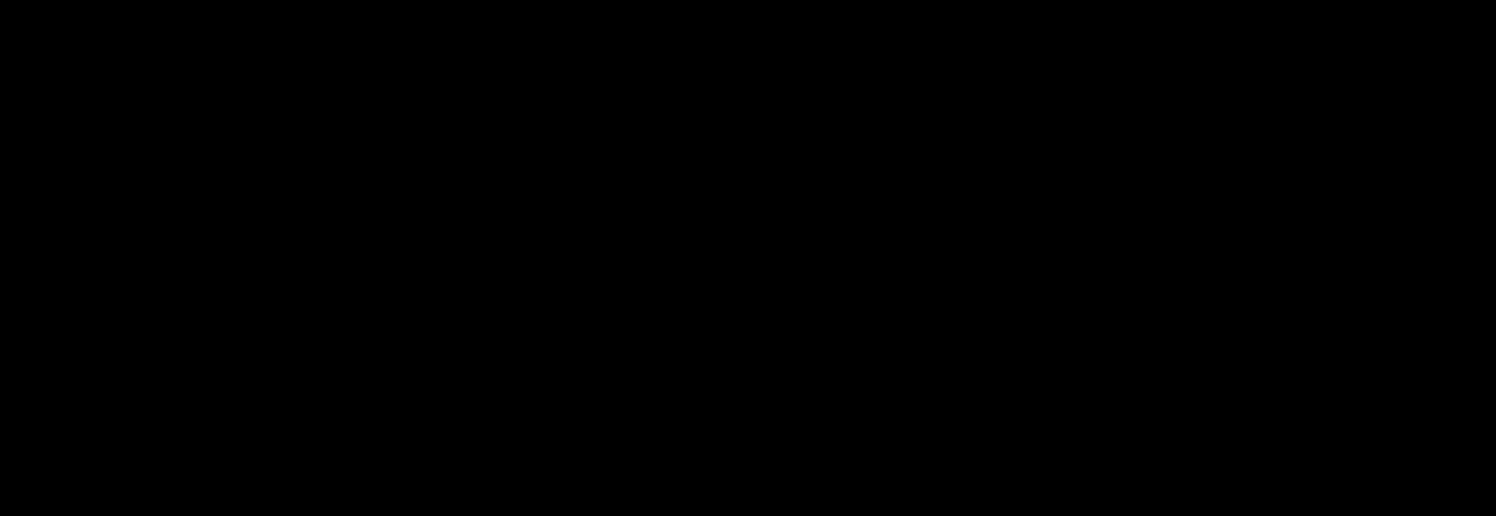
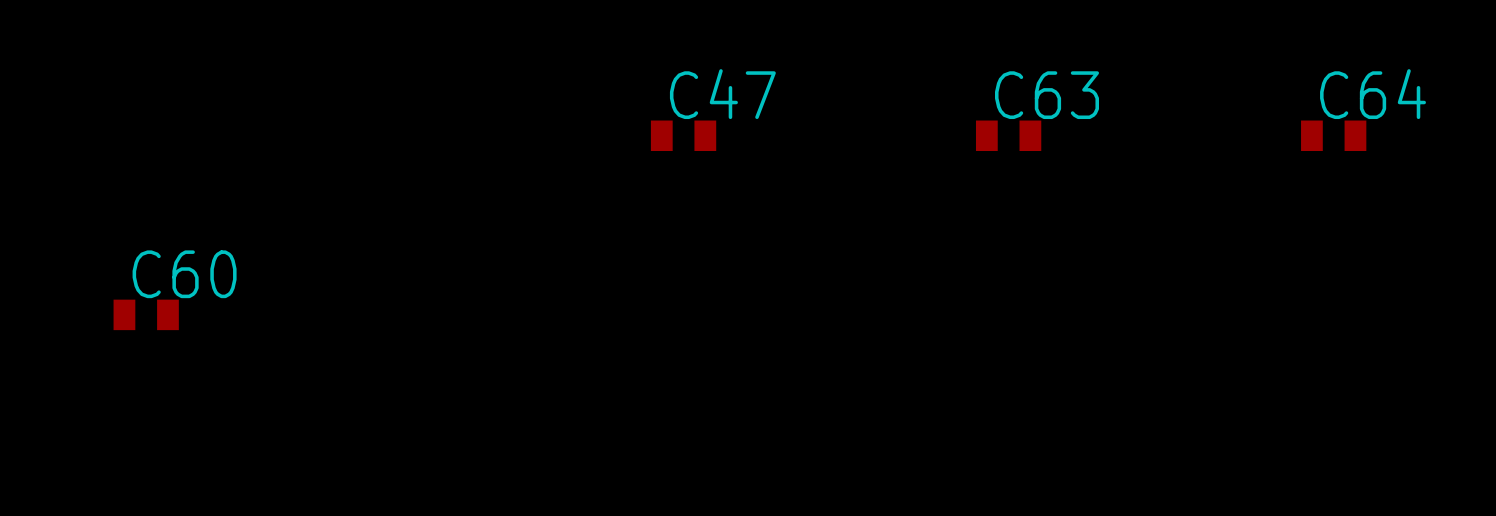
C47: none -> (683, 135)
C63: none -> (1008, 135)
C64: none -> (1333, 135)
C60: none -> (146, 314)

